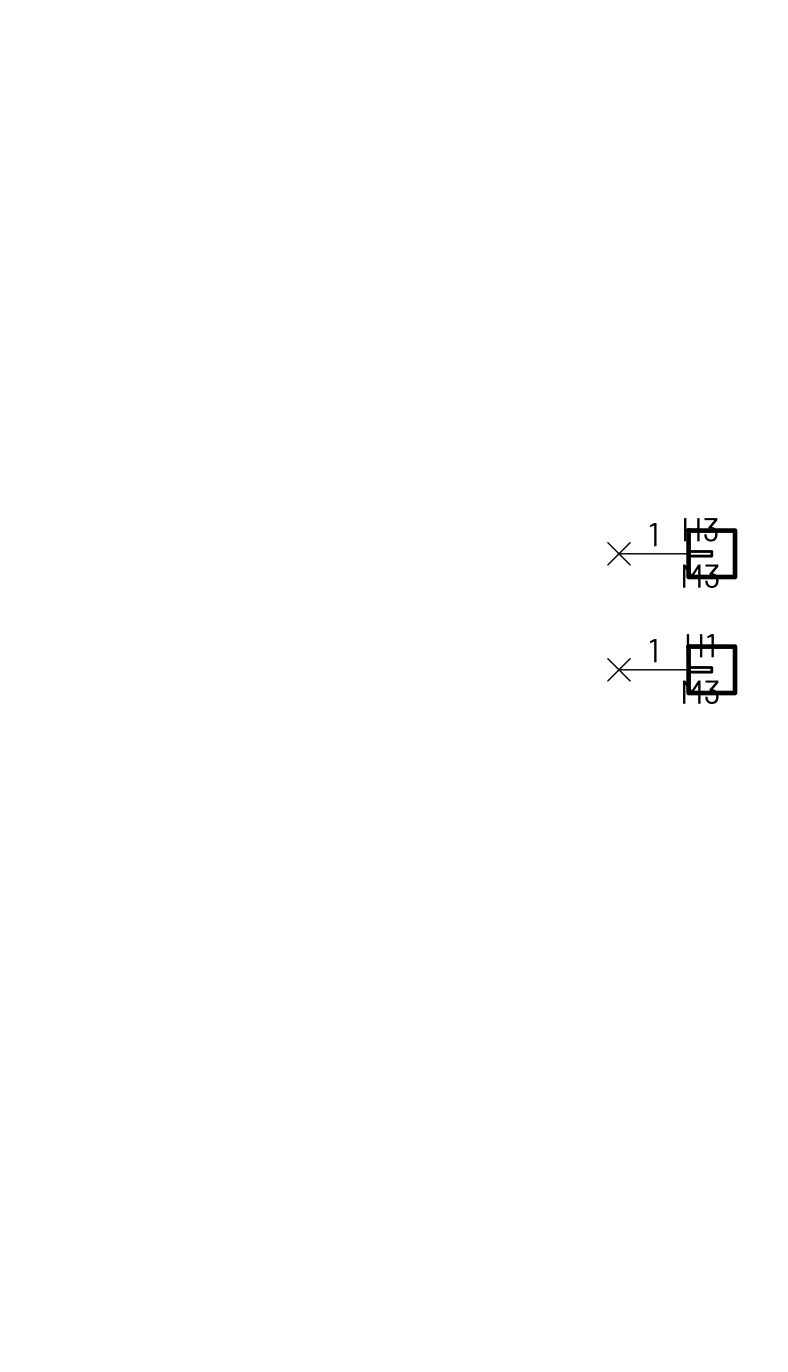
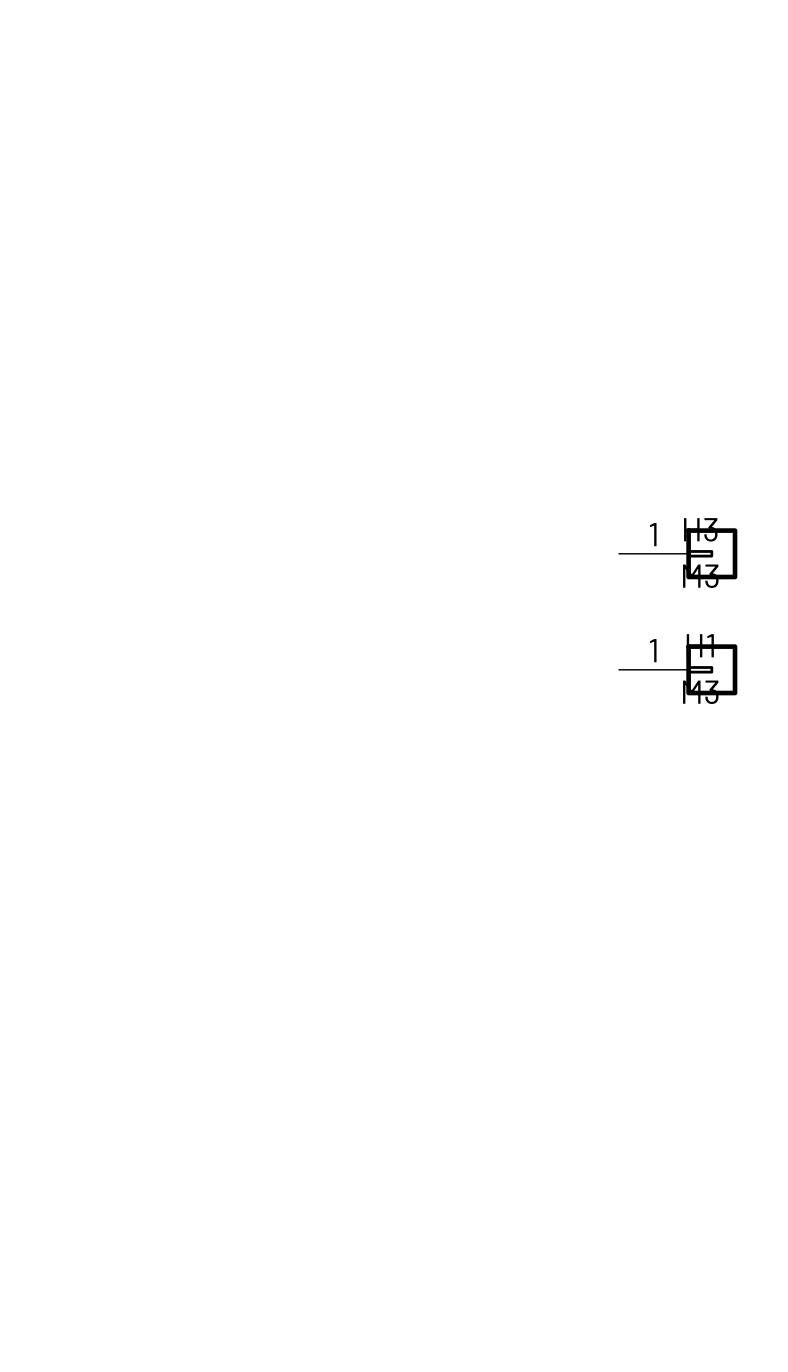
no-connect mark: (618, 553) -> none
no-connect mark: (618, 669) -> none

